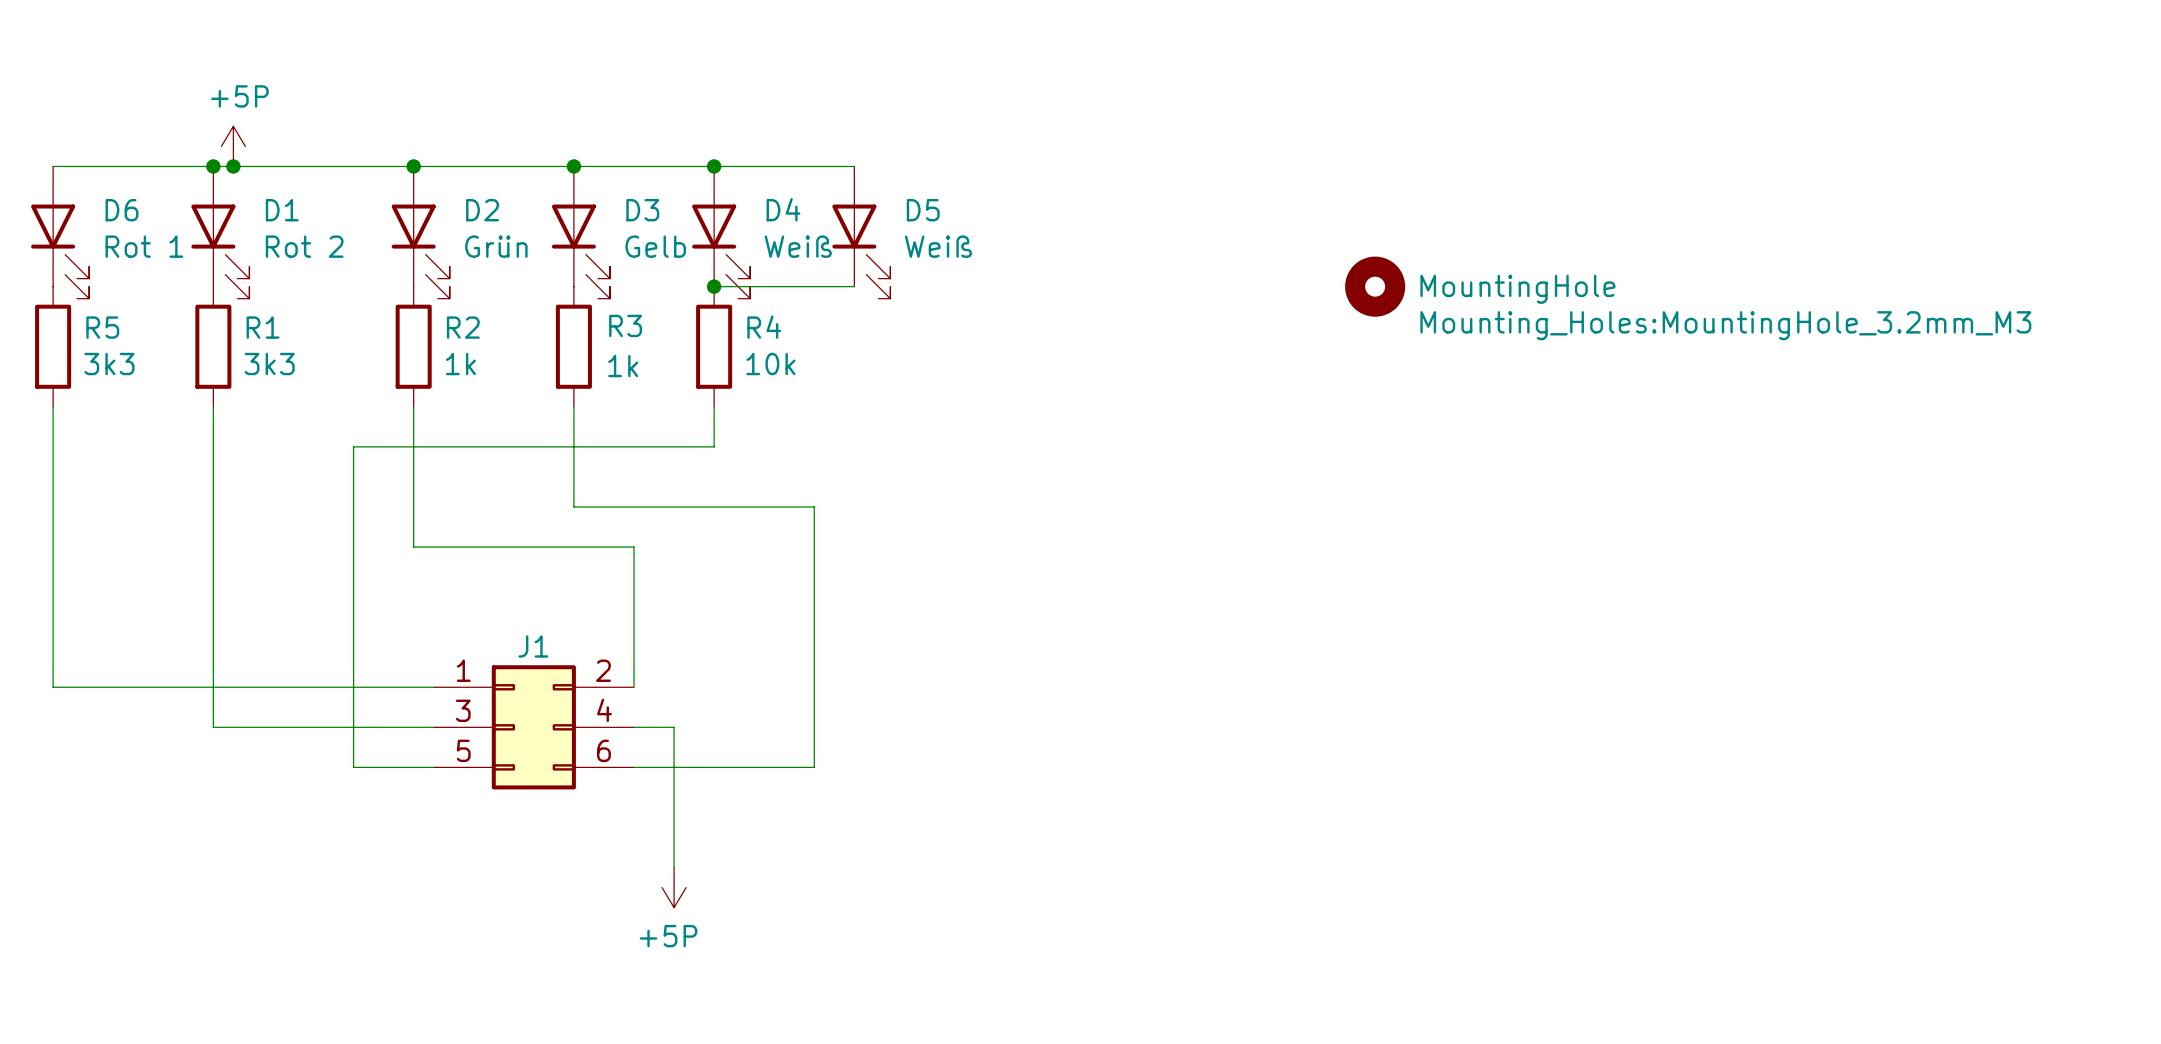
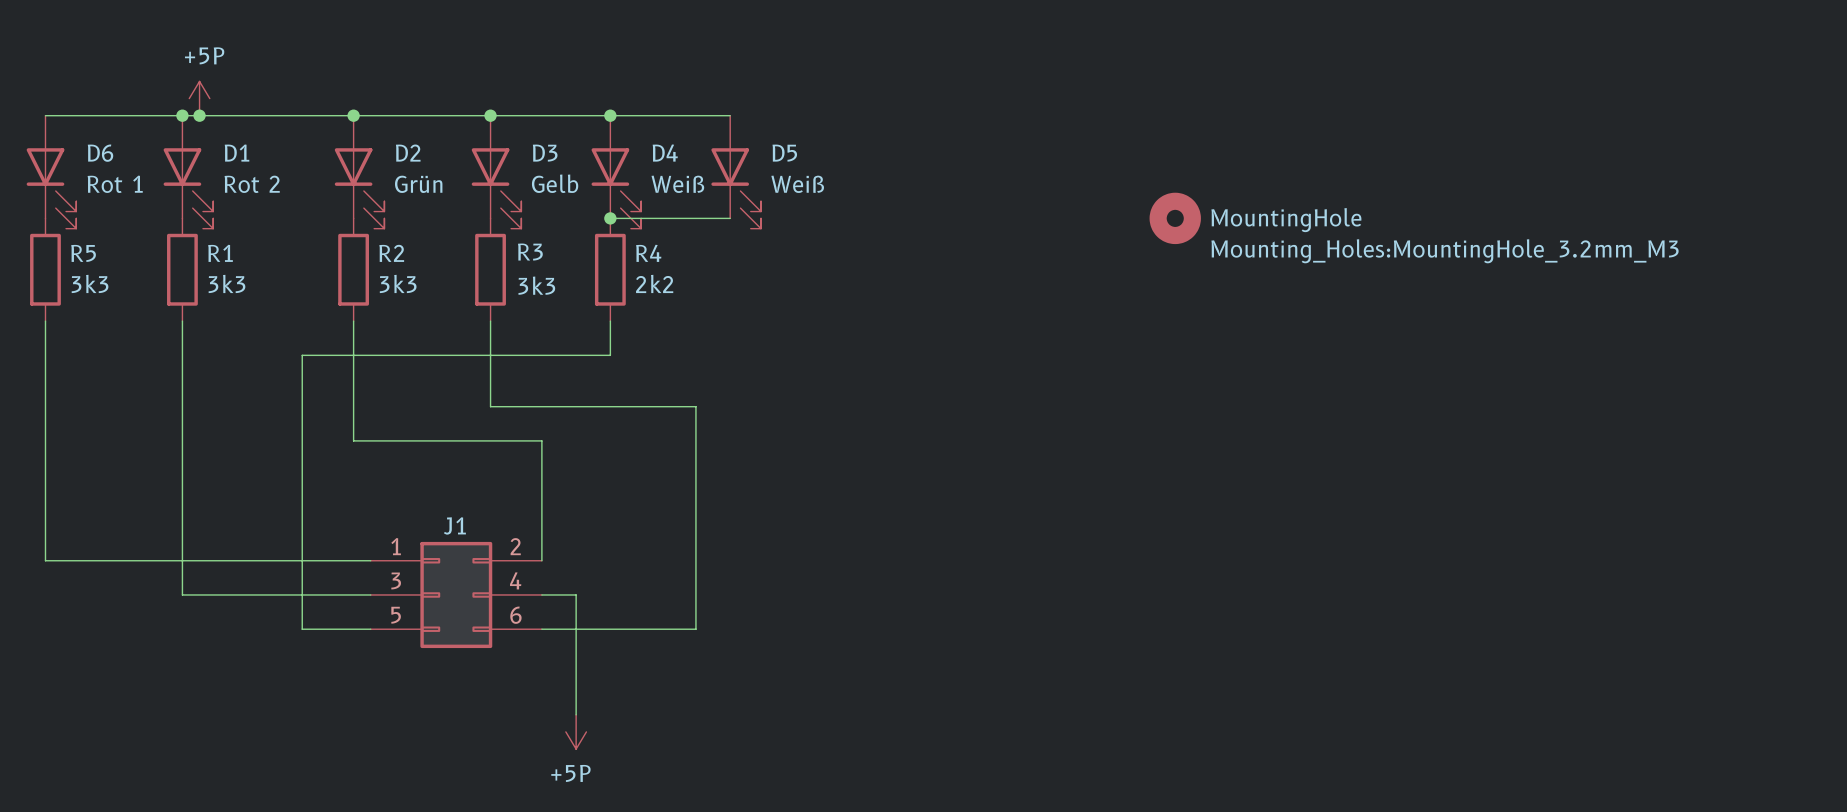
R2 value: 1k (460, 364) -> 3k3 (398, 283)
R4 value: 10k (770, 364) -> 2k2 (654, 283)
1k name: 1k (623, 366) -> 3k3 (536, 285)

